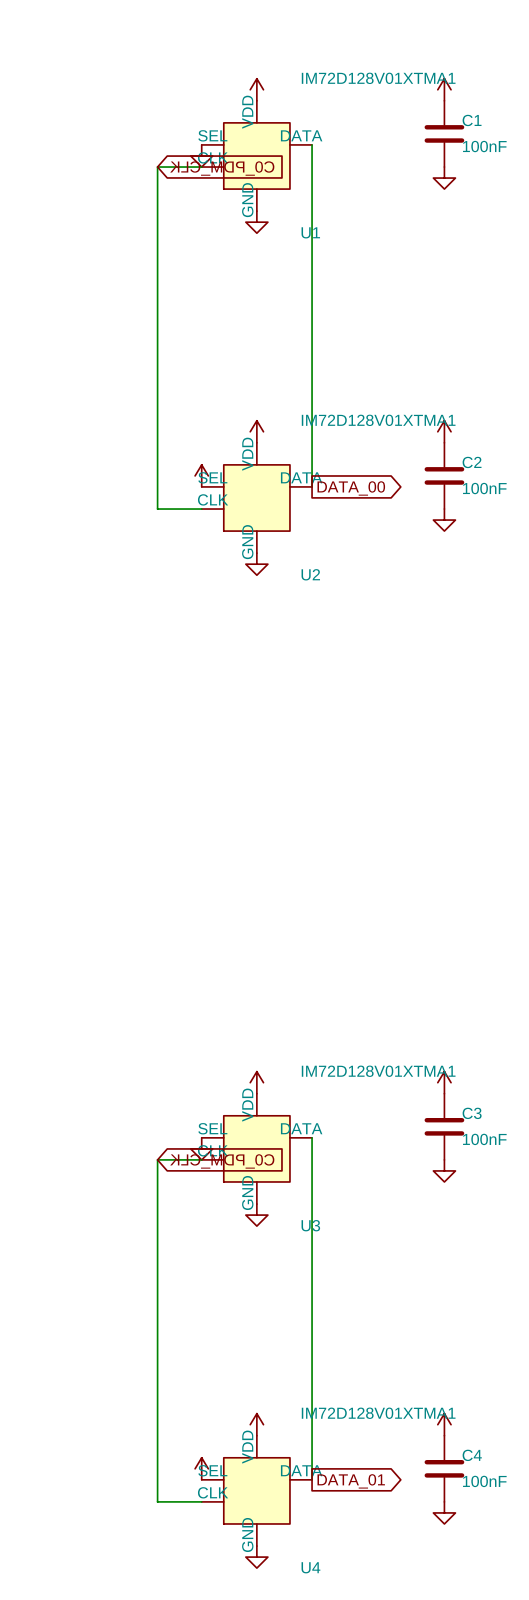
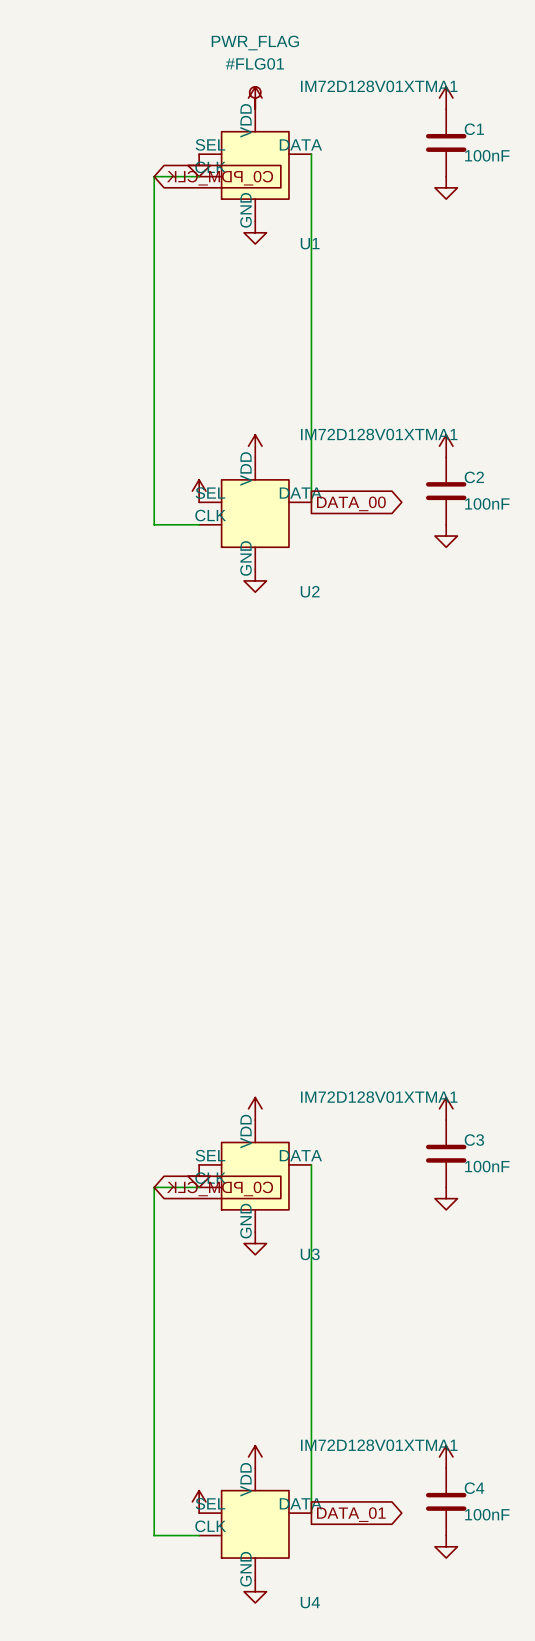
#FLG01: none -> PWR_FLAG (255, 98)

